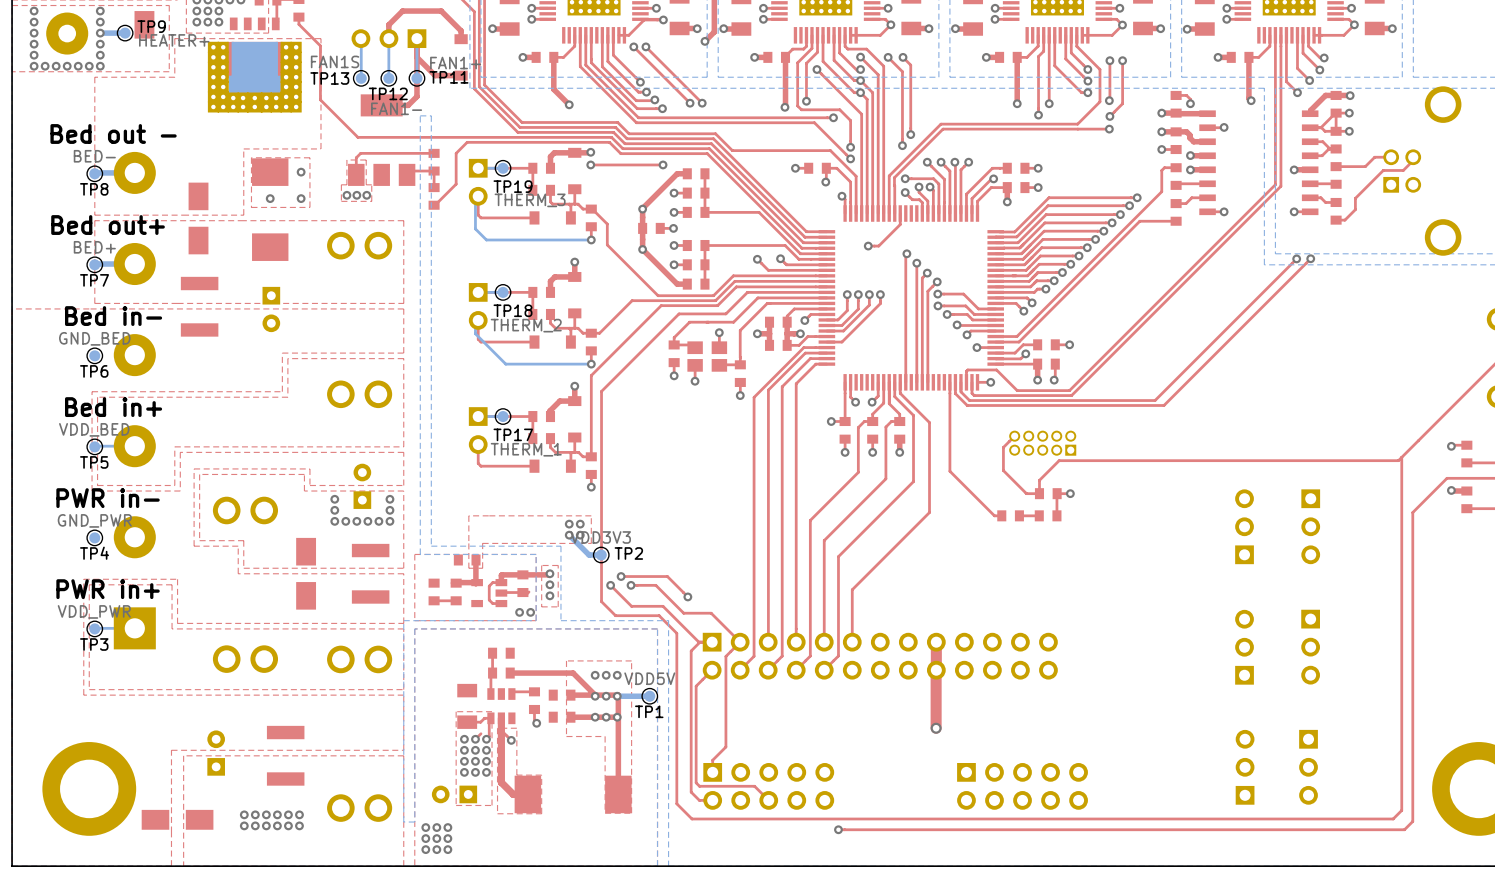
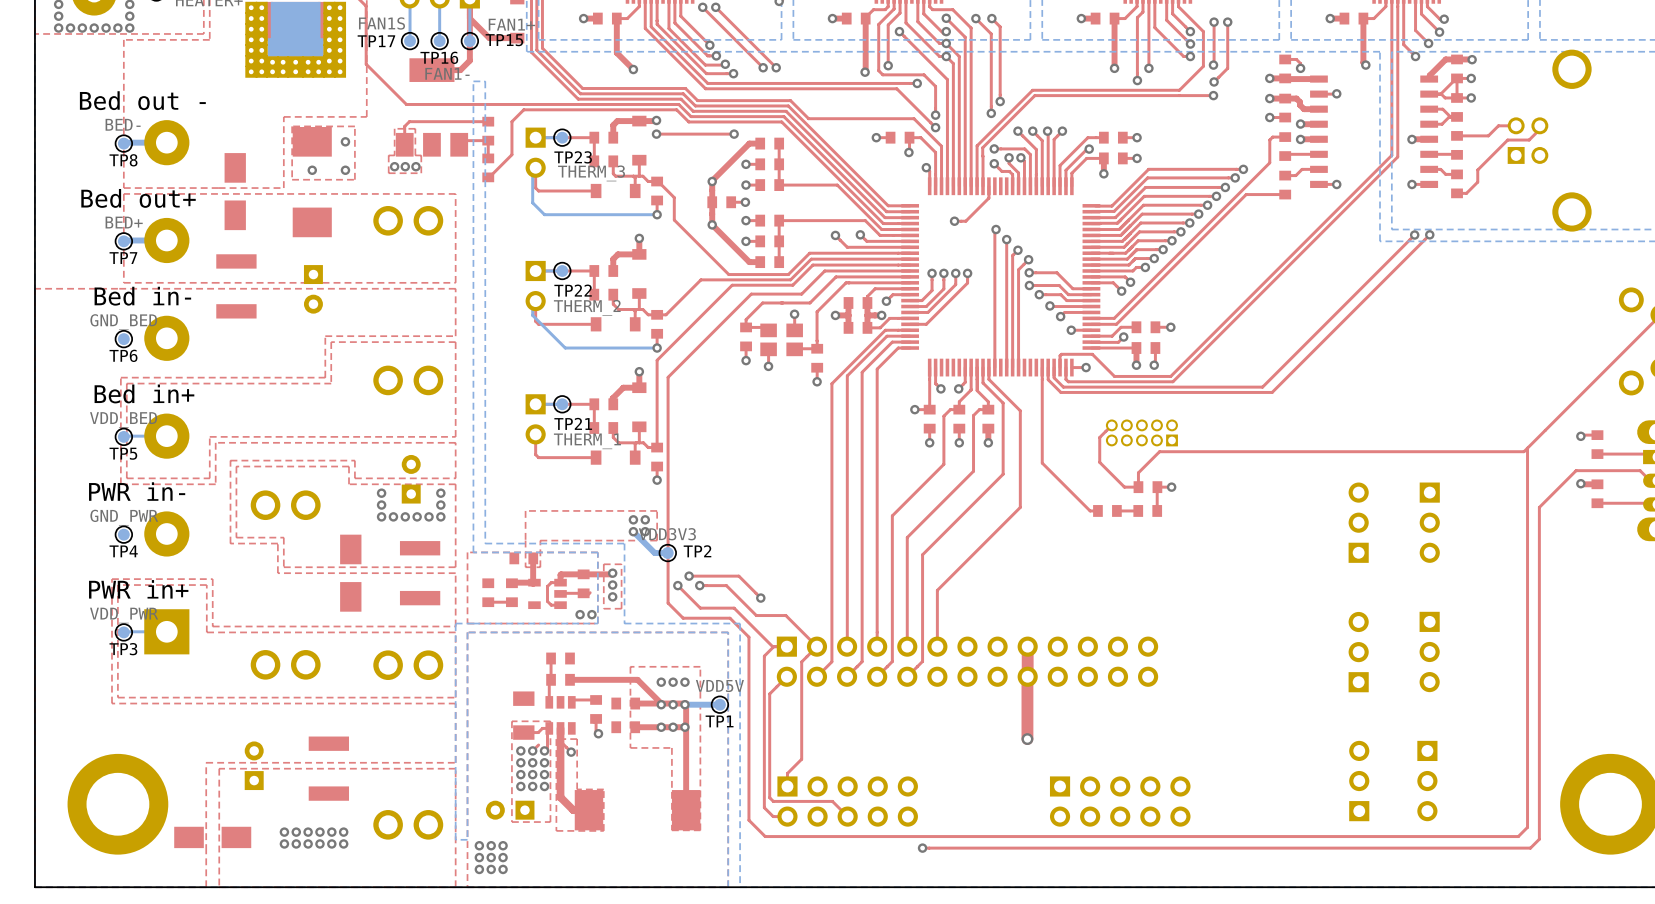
TP11 name: TP11 (449, 77) -> TP15 (504, 40)
TP13 name: TP13 (329, 78) -> TP17 (376, 41)
TP12 name: TP12 (388, 93) -> TP16 (439, 57)
TP19 name: TP19 (513, 186) -> TP23 (573, 157)
TP18 name: TP18 (513, 310) -> TP22 (573, 290)
TP17 name: TP17 (513, 434) -> TP21 (573, 423)

